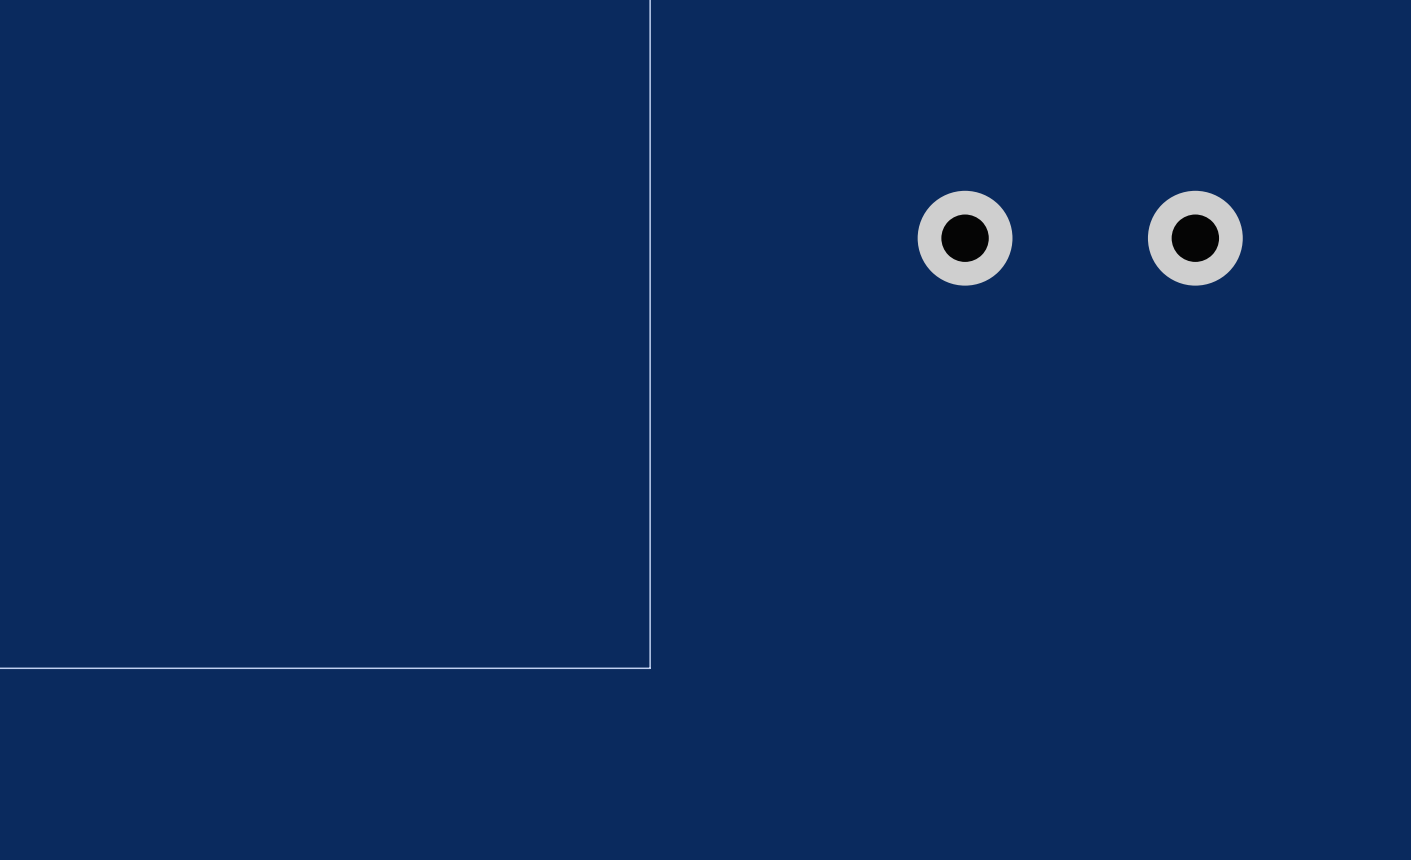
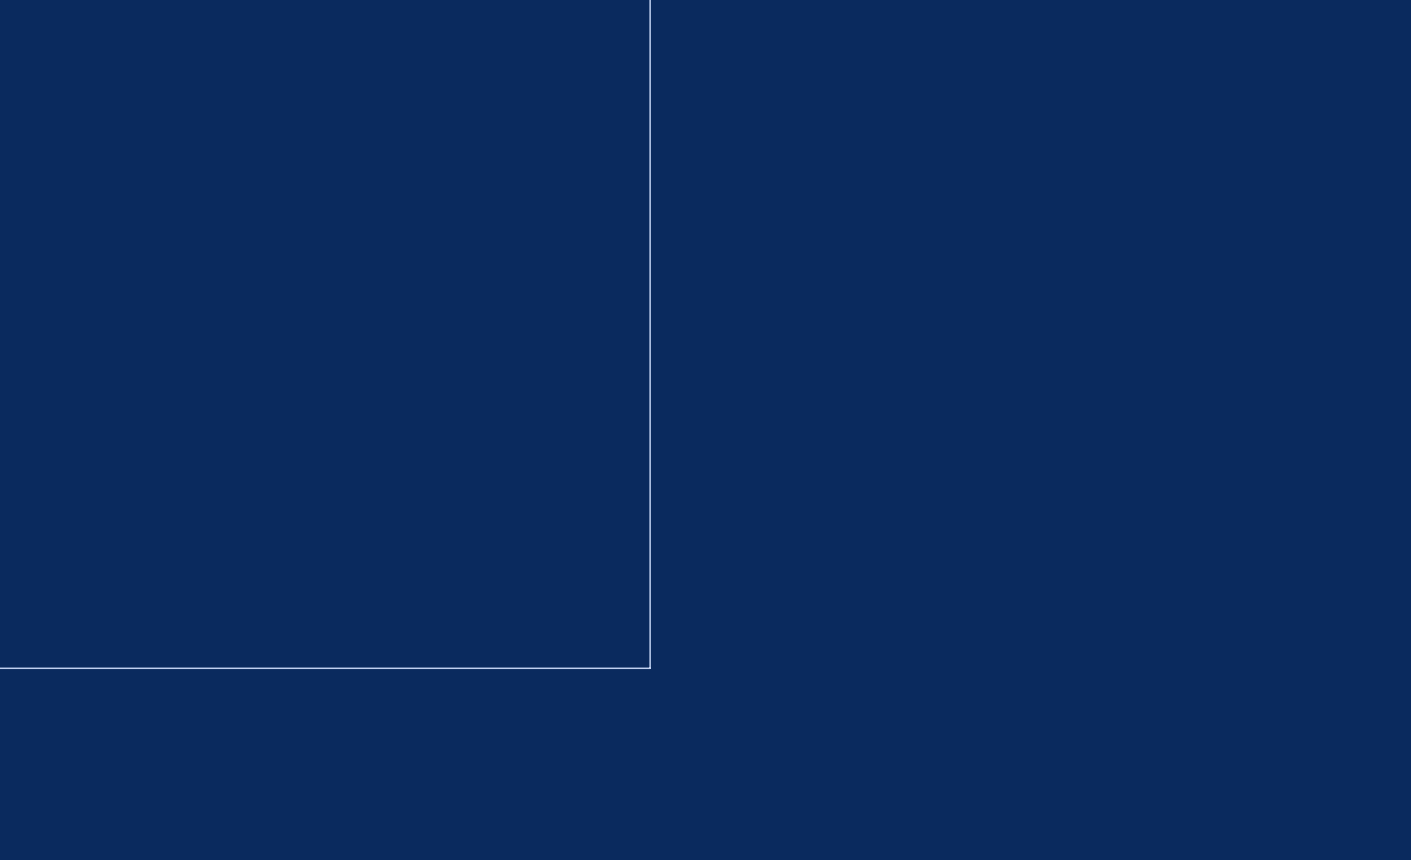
part: (1080, 238) -> none

